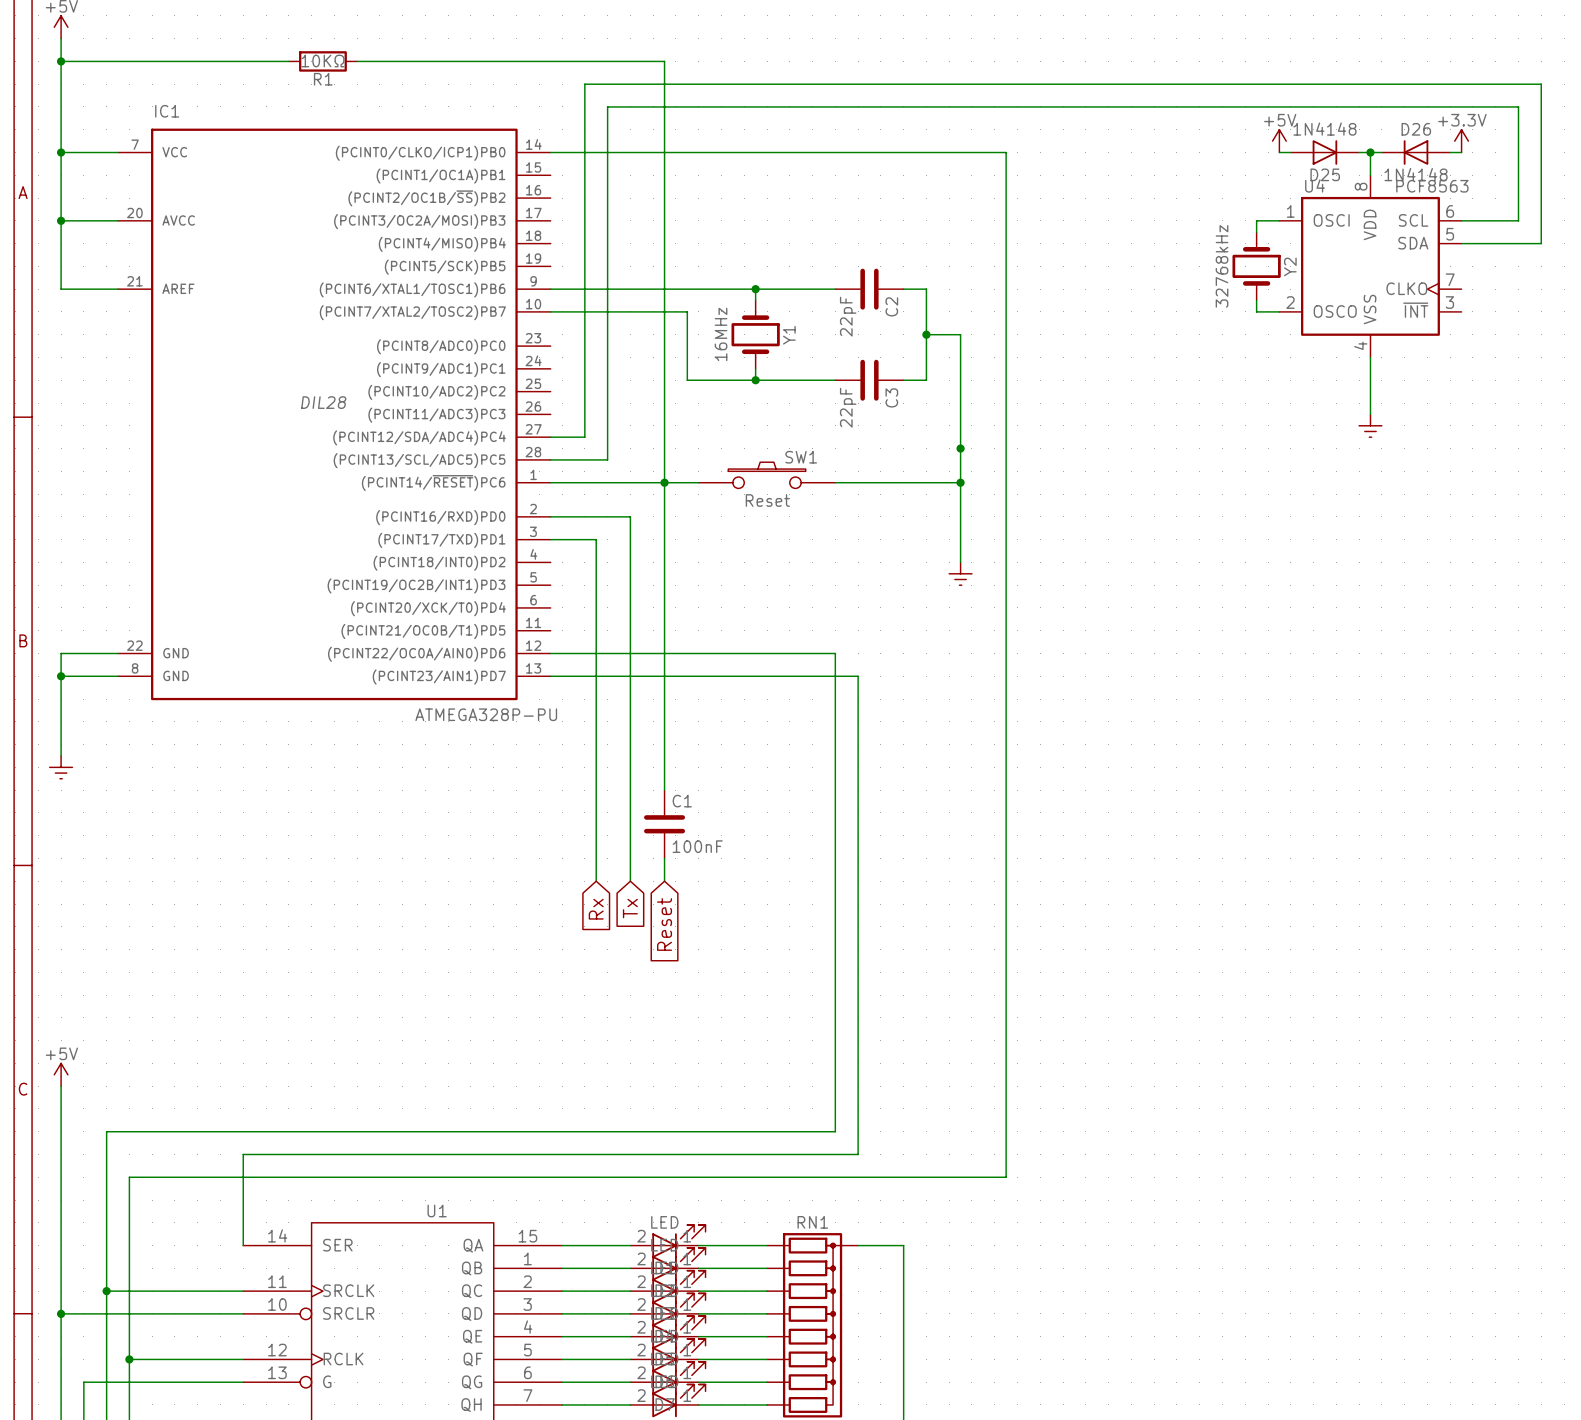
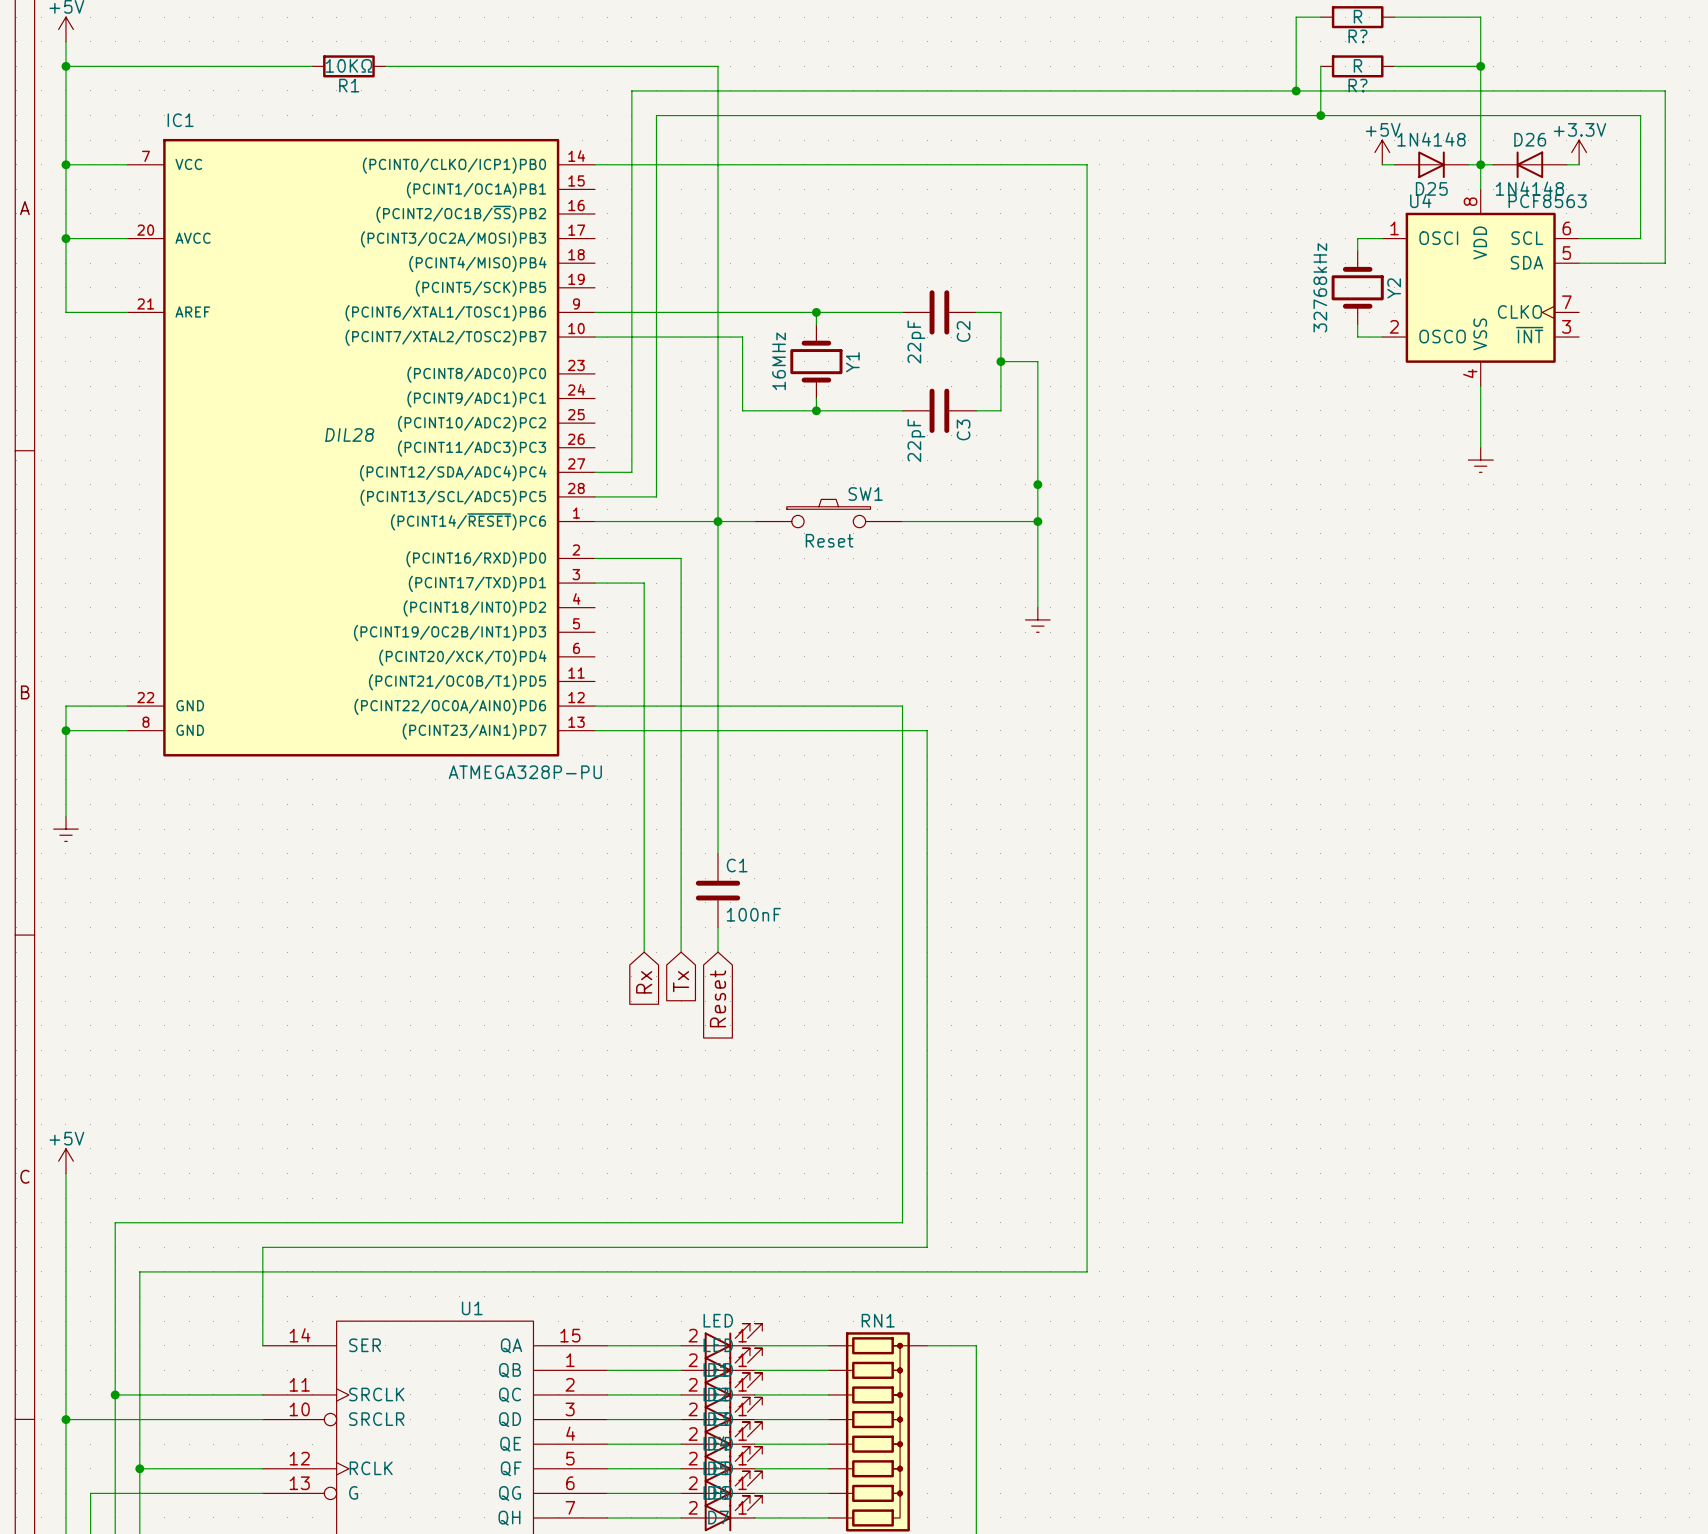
wire: none -> (1320, 17) (1296, 17) (1296, 90)
R?: none -> R (1357, 17)
wire: none -> (1394, 17) (1480, 17) (1480, 164)
wire: none -> (1320, 66) (1320, 115)
R?: none -> R (1357, 66)
wire: none -> (1394, 66) (1480, 66)
junction: none -> (1480, 66)
junction: none -> (1296, 90)
junction: none -> (1320, 115)

